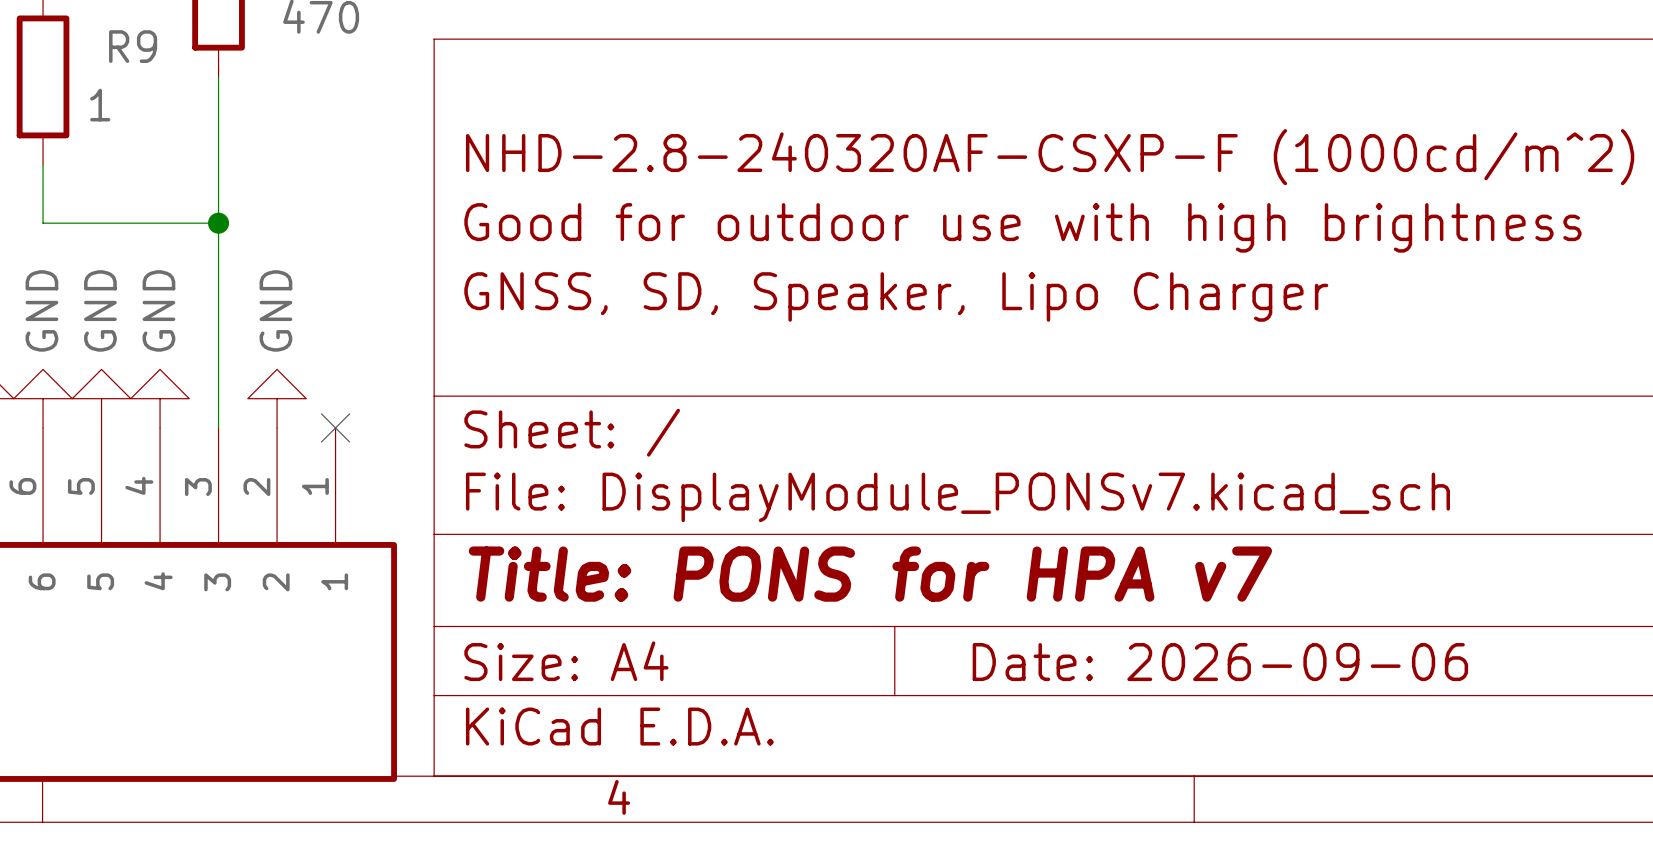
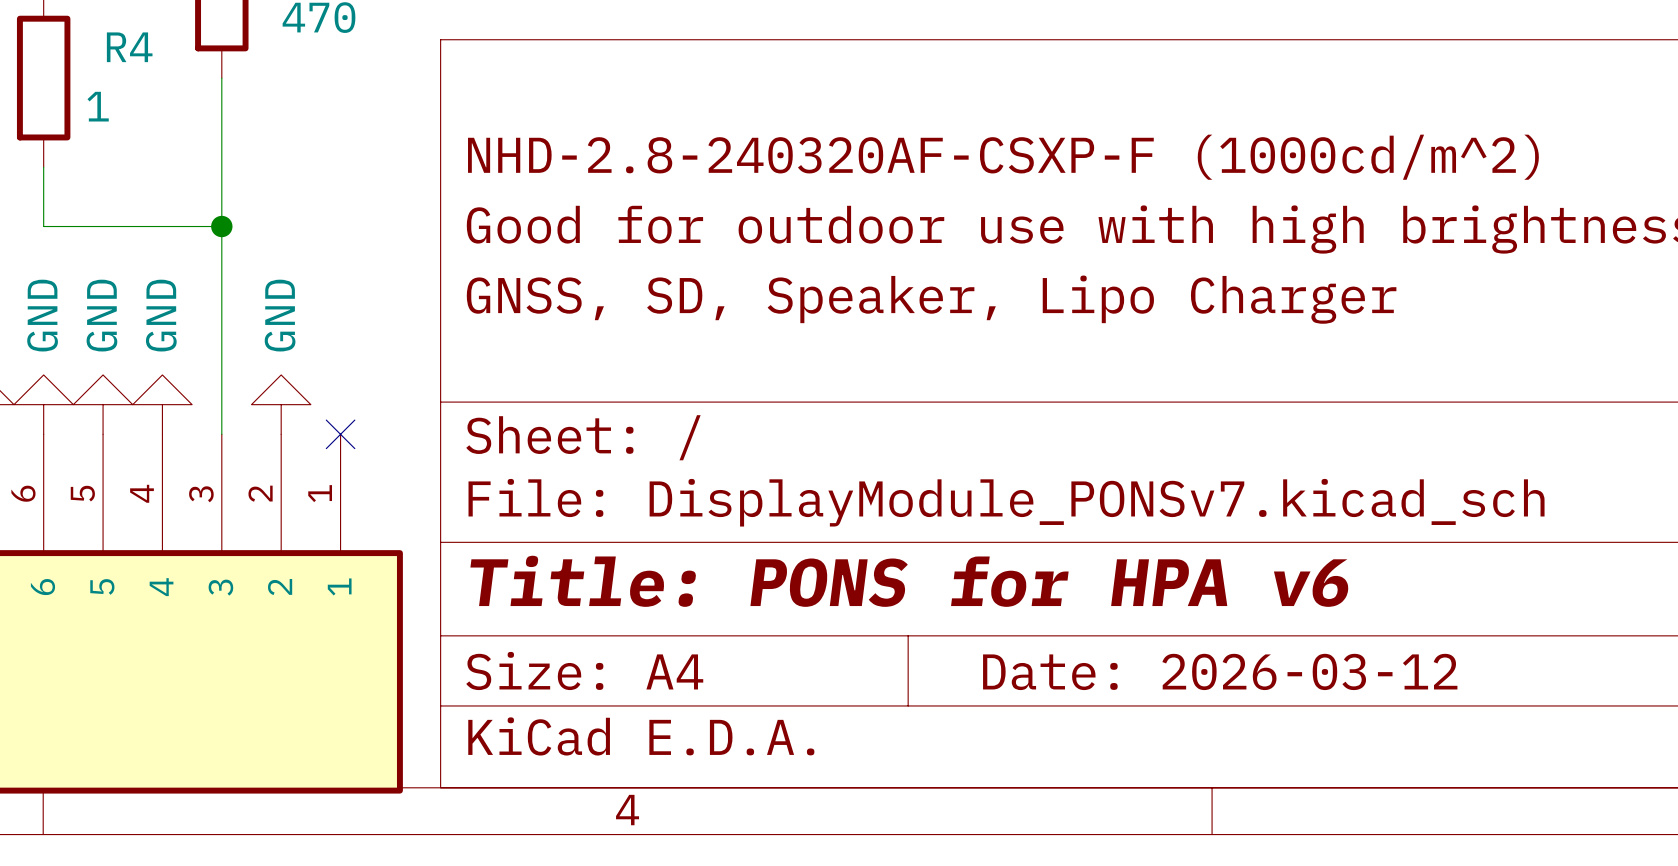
R9 name: R9 (133, 46) -> R4 (129, 47)
title block: Title: PONS for HPA v7 (870, 574) -> Title: PONS for HPA v6 (909, 581)
title block: Date: 2026-09-06 (1220, 662) -> Date: 2026-03-12 (1220, 671)

